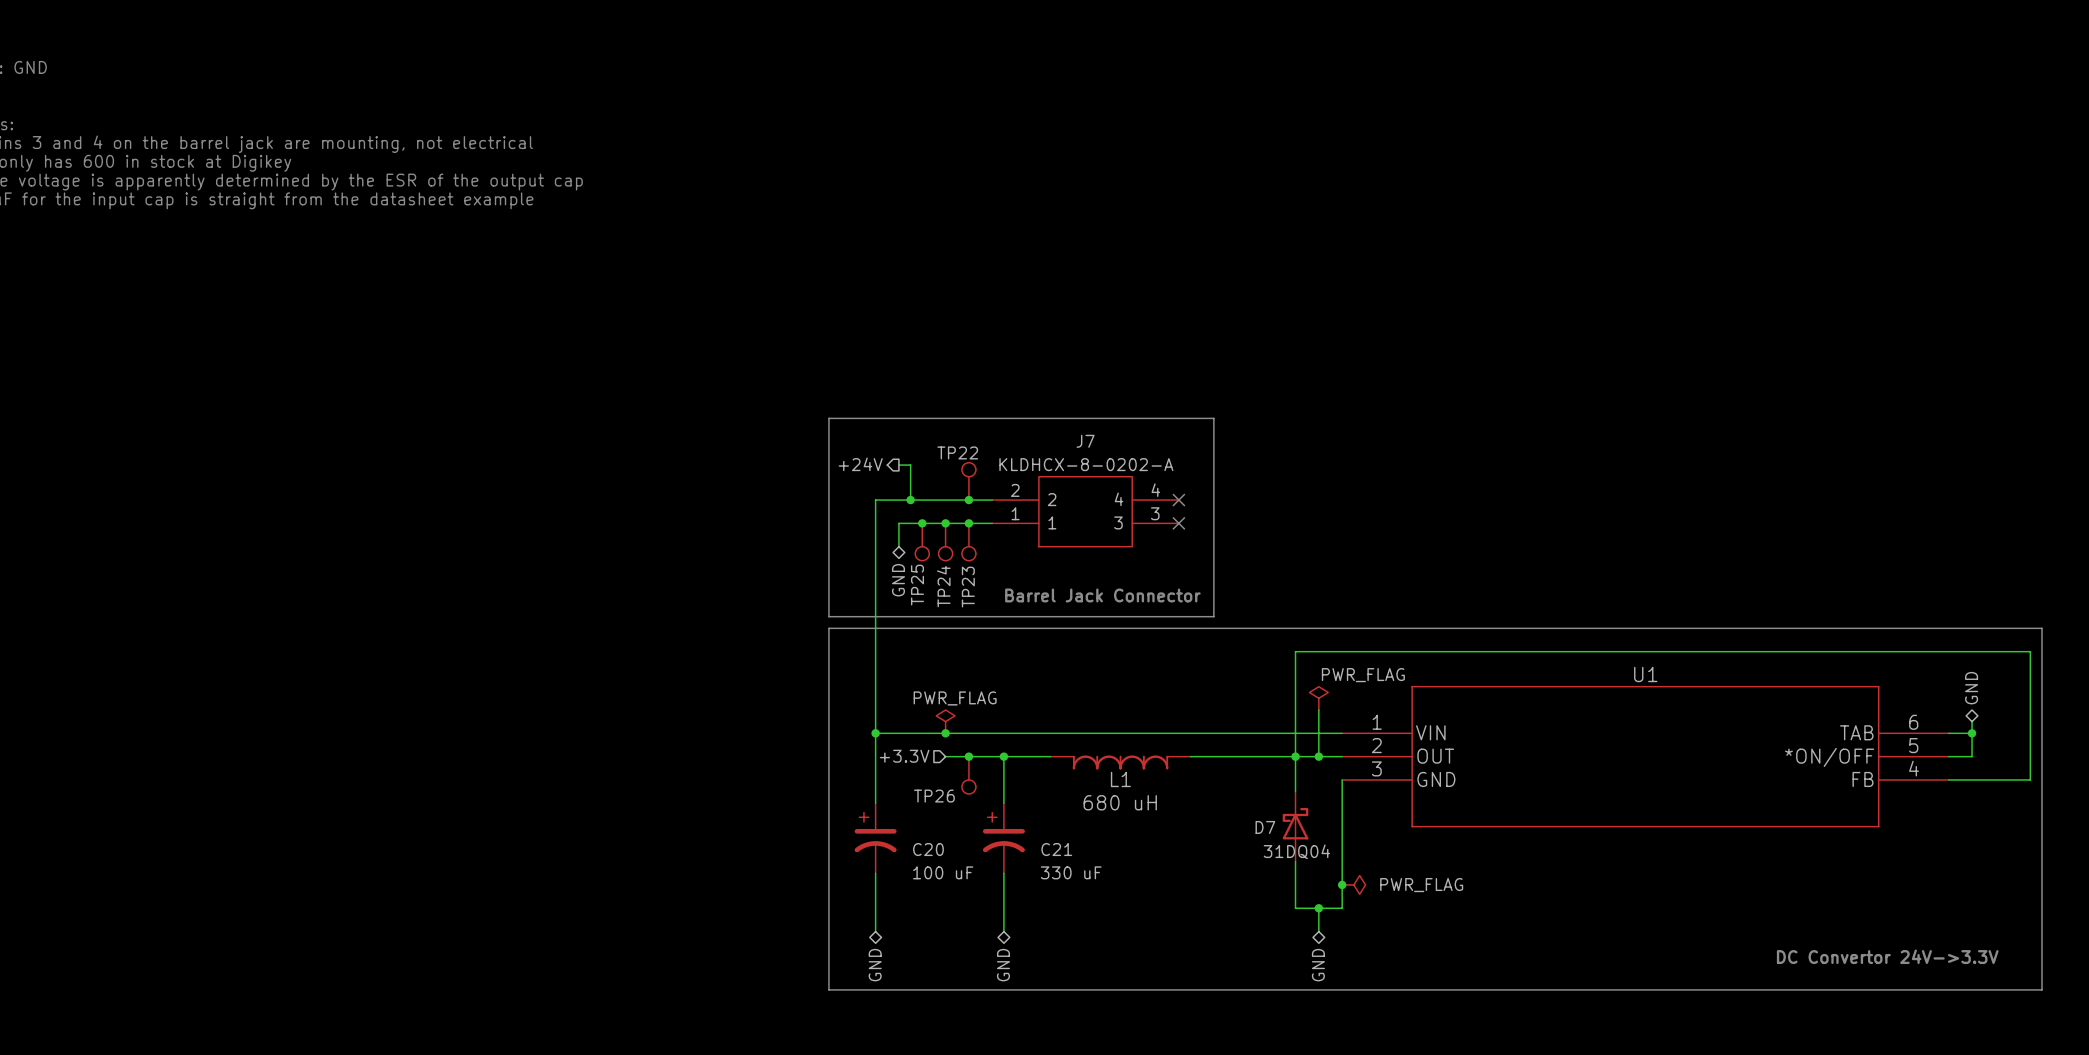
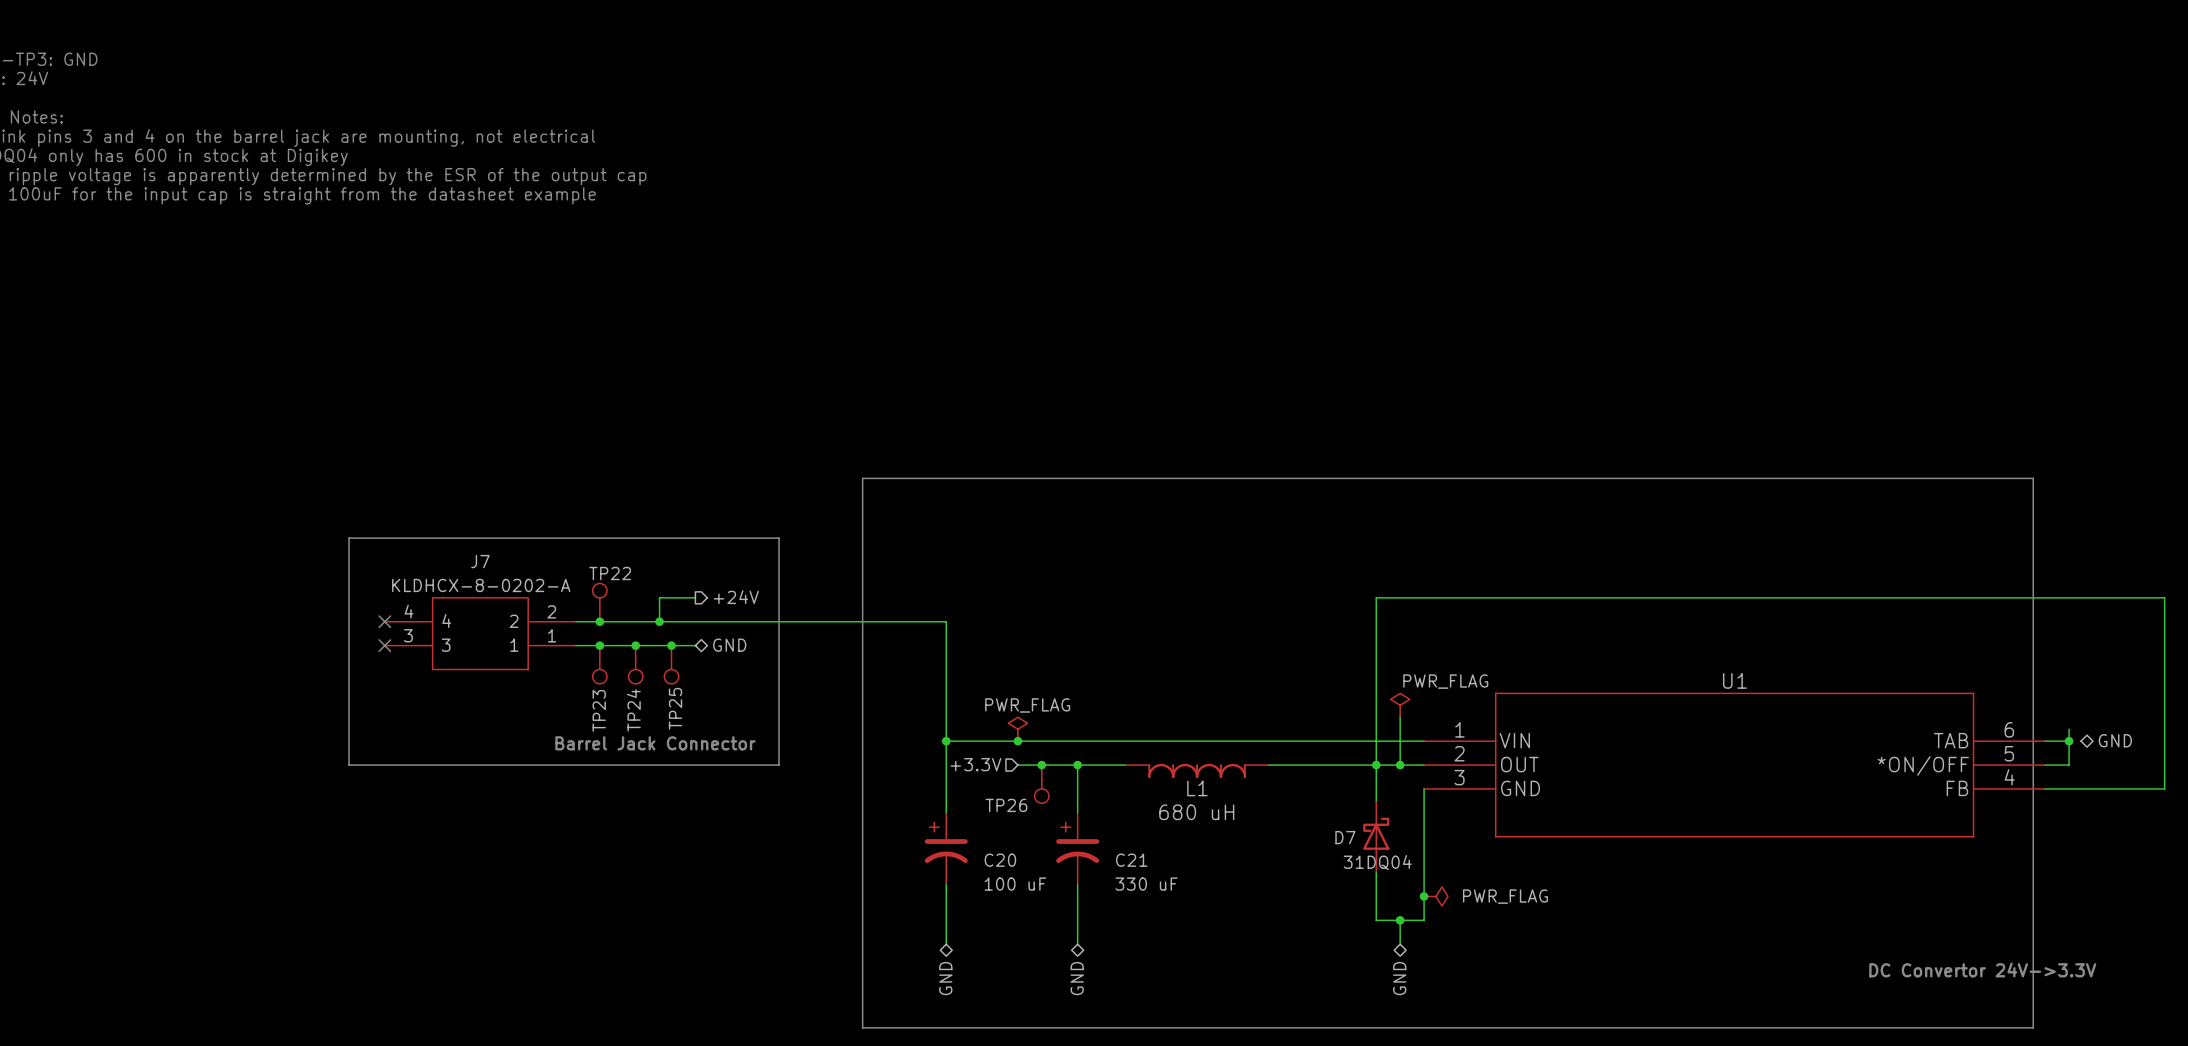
line: (828, 418) (828, 616) (1213, 616) (1213, 418) (828, 418) -> none
TP22 name position: TP22 (957, 452) -> TP22 (610, 573)
hierarchical label: +24V (860, 464) -> none
wire: (898, 465) (910, 465) (910, 500) -> none
TP22 position: (968, 481) -> (599, 602)
junction: (910, 500) -> none
junction: (968, 500) -> none
wire: (992, 500) (875, 500) (875, 616) -> (575, 621) (946, 621)
no-connect mark: (1178, 500) -> none
J7 flip: as is (1085, 511) -> left-right (480, 633)
J7 position: (1085, 511) -> (480, 633)
junction: (922, 523) -> none
junction: (945, 523) -> none
junction: (968, 523) -> none
wire: (992, 523) (898, 523) (898, 546) -> none
no-connect mark: (1178, 523) -> none
line: none -> (349, 538) (779, 538) (779, 765) (349, 765) (349, 538)
TP25 position: (922, 542) -> (671, 664)
TP24 position: (945, 542) -> (635, 664)
TP23 position: (968, 542) -> (599, 664)
hierarchical label: GND (898, 580) -> none
TP25 name position: TP25 (917, 585) -> TP25 (675, 708)
hierarchical label: none -> +24V (736, 597)
wire: none -> (695, 597) (659, 597) (659, 621)
text: Barrel Jack Connector (1102, 595) -> none
no-connect mark: none -> (384, 621)
junction: none -> (599, 621)
junction: none -> (659, 621)
line: (828, 628) (828, 989) (2042, 989) (2042, 628) (828, 628) -> (862, 478) (862, 1027) (2033, 1027) (2033, 478) (862, 478)
hierarchical label: none -> GND (729, 645)
no-connect mark: none -> (384, 645)
wire: none -> (575, 645) (695, 645)
junction: none -> (599, 645)
junction: none -> (635, 645)
junction: none -> (671, 645)
wire: (1295, 651) (2030, 651) (2030, 779) -> (1376, 657) (1376, 597) (2164, 597) (2164, 788) (2128, 788)
hierarchical label rotation: 0° (1971, 688) -> 90° clockwise (2115, 740)
hierarchical label position: GND (1971, 688) -> GND (2115, 740)
text: none -> Barrel Jack Connector (655, 743)

